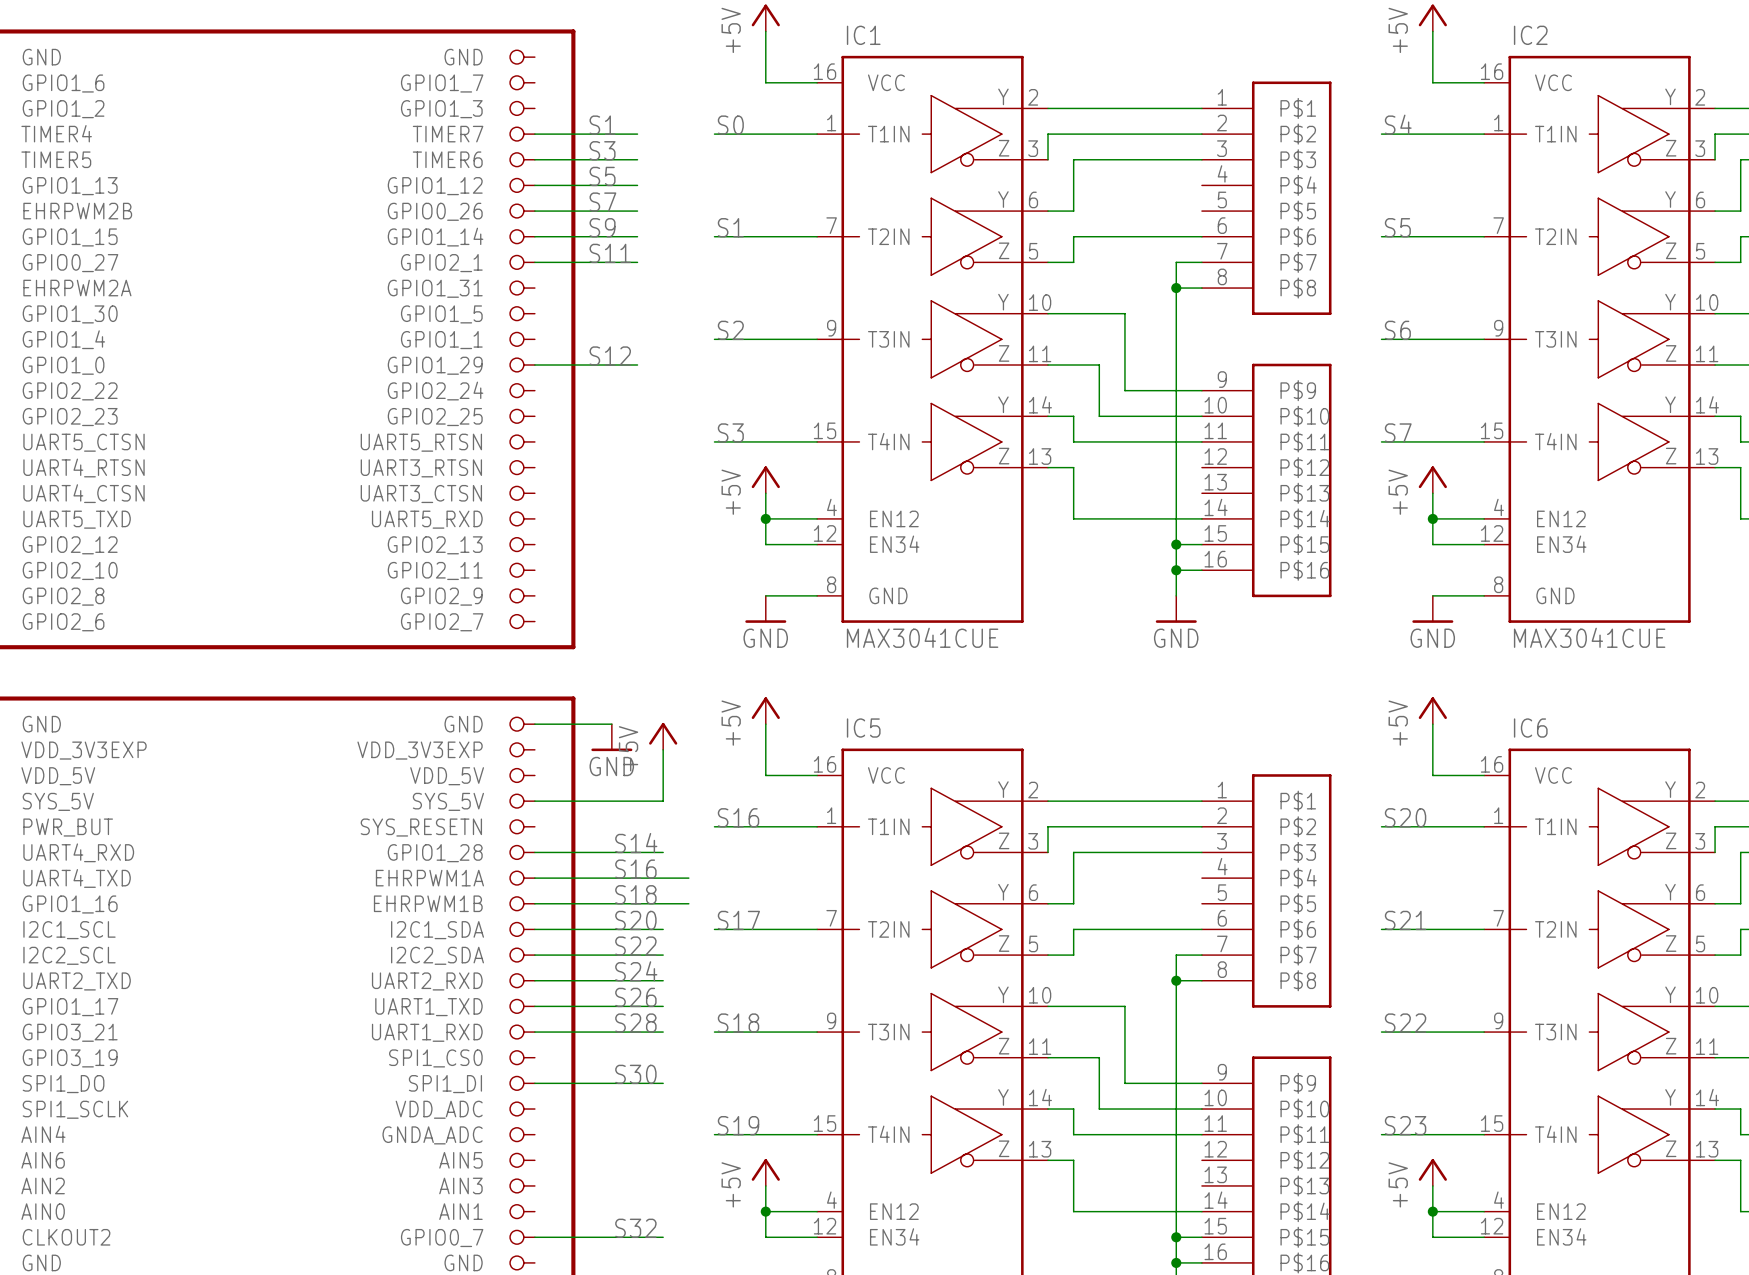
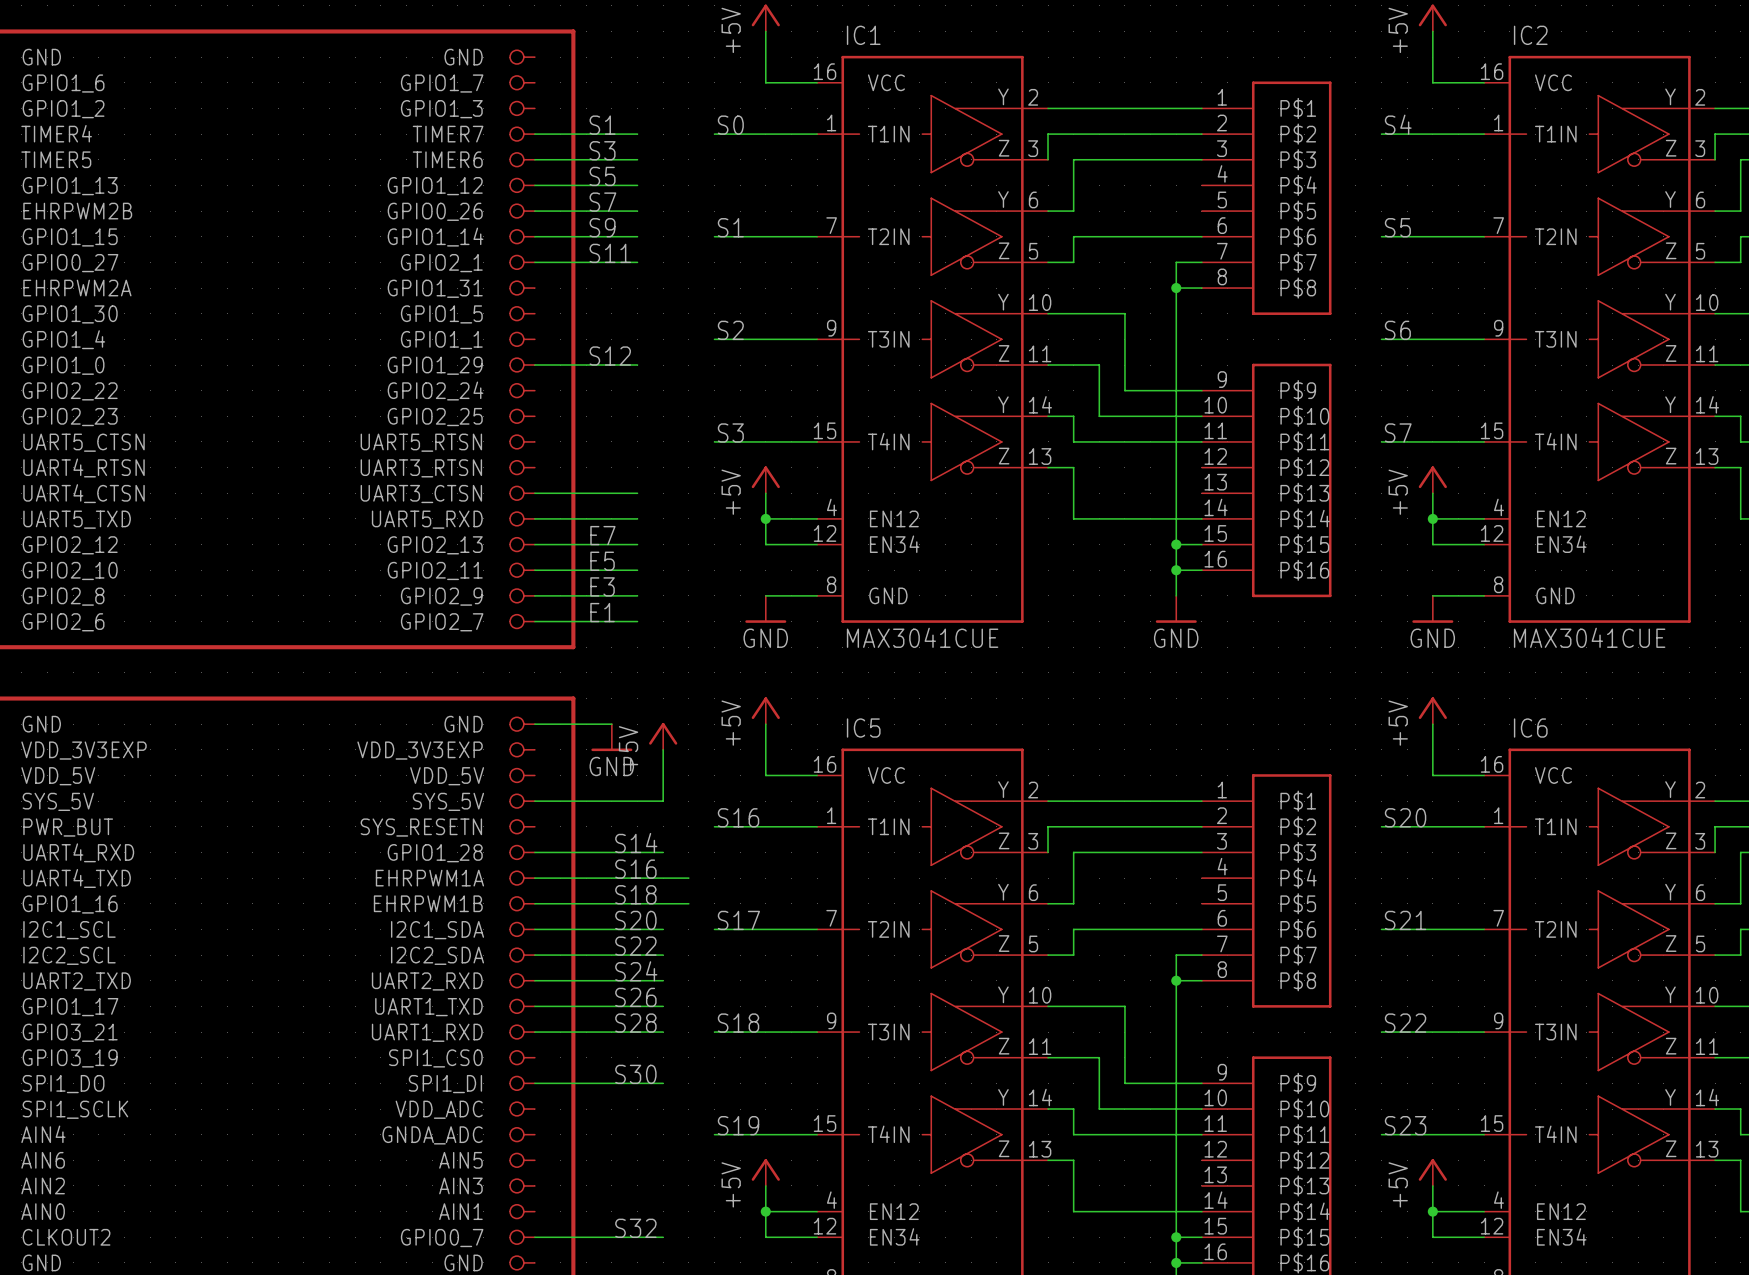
wire: none -> (534, 493) (637, 493)
wire: none -> (534, 518) (637, 518)
label: none -> E7 (602, 535)
wire: none -> (534, 544) (637, 544)
label: none -> E5 (602, 561)
wire: none -> (534, 570) (637, 570)
label: none -> E3 (602, 586)
wire: none -> (534, 595) (637, 595)
label: none -> E1 (602, 612)
wire: none -> (534, 621) (637, 621)

